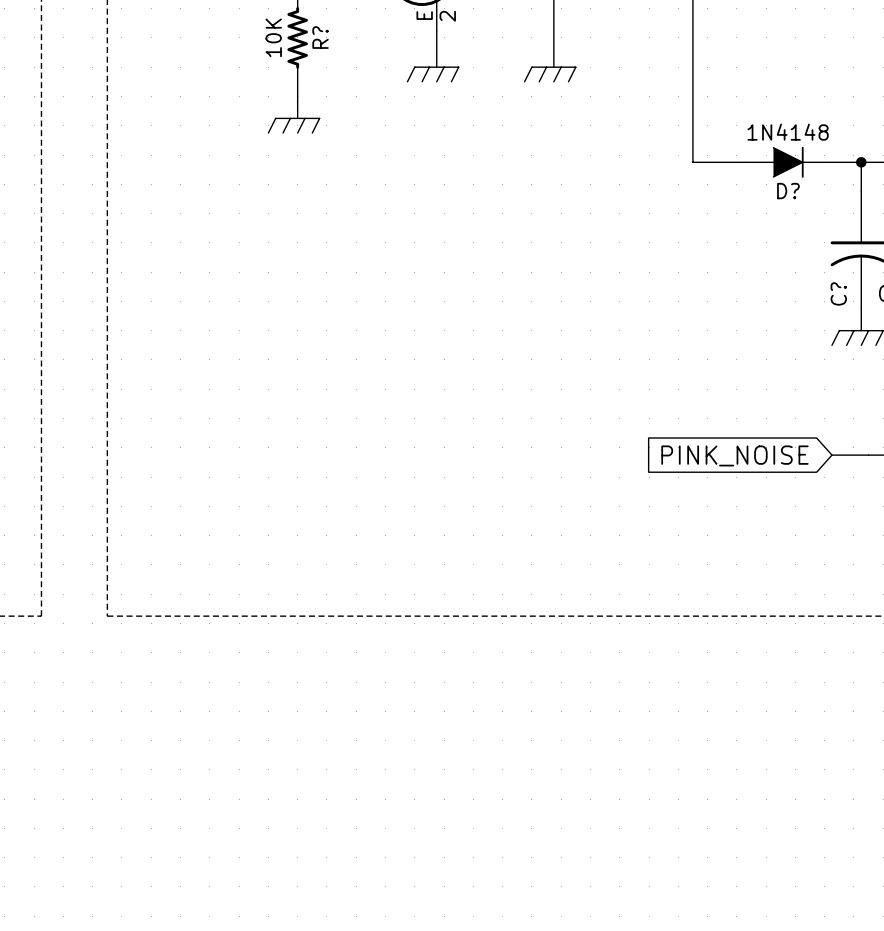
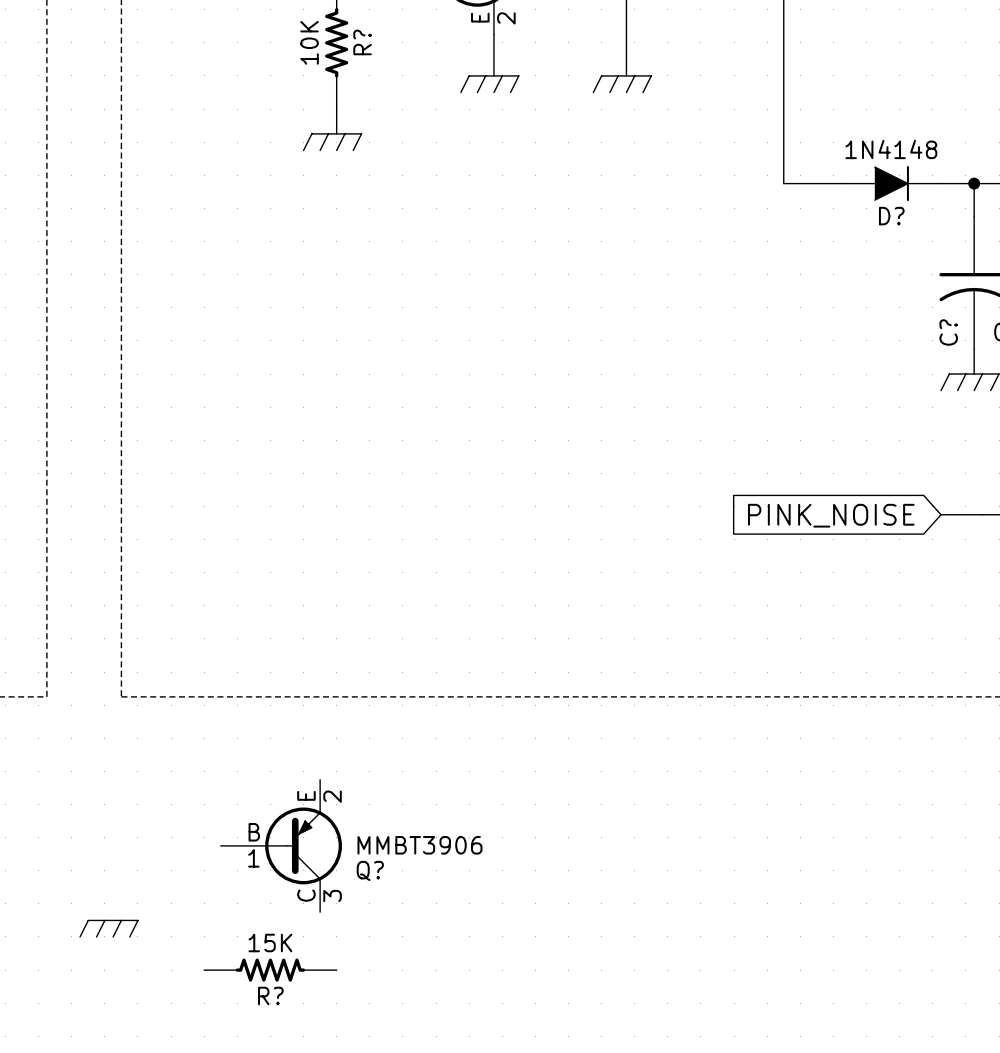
Q?: none -> MMBT3906 (281, 845)
power symbol: none -> (109, 928)
R?: none -> 15K (270, 970)

